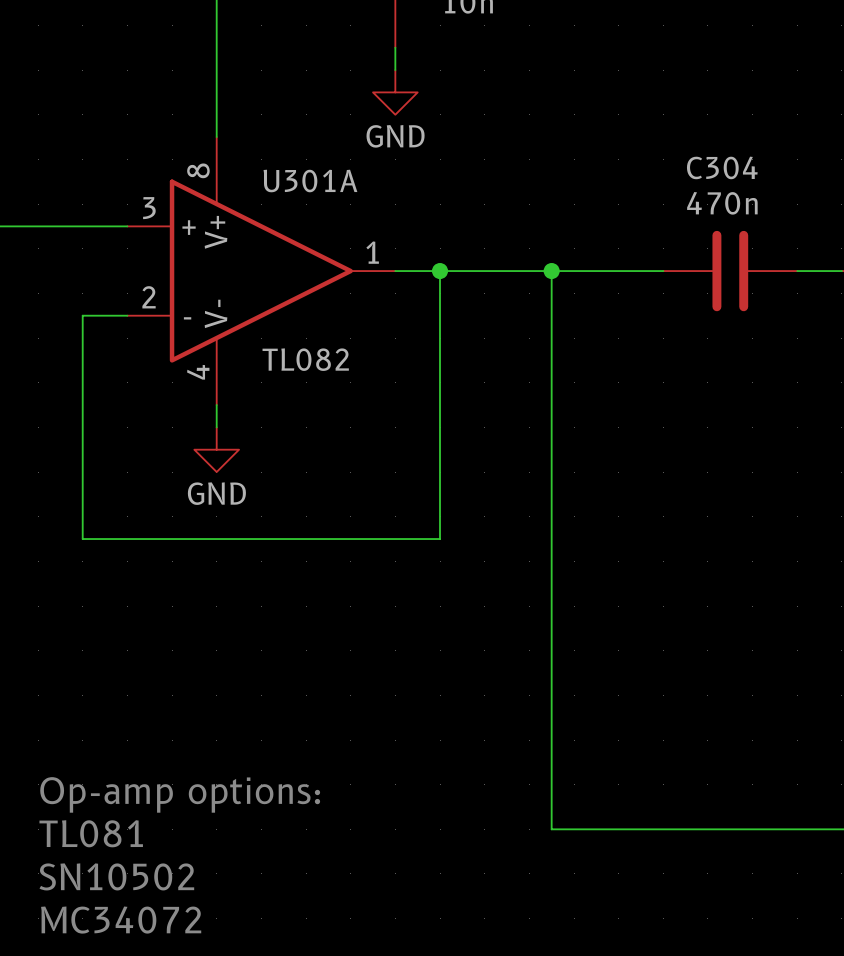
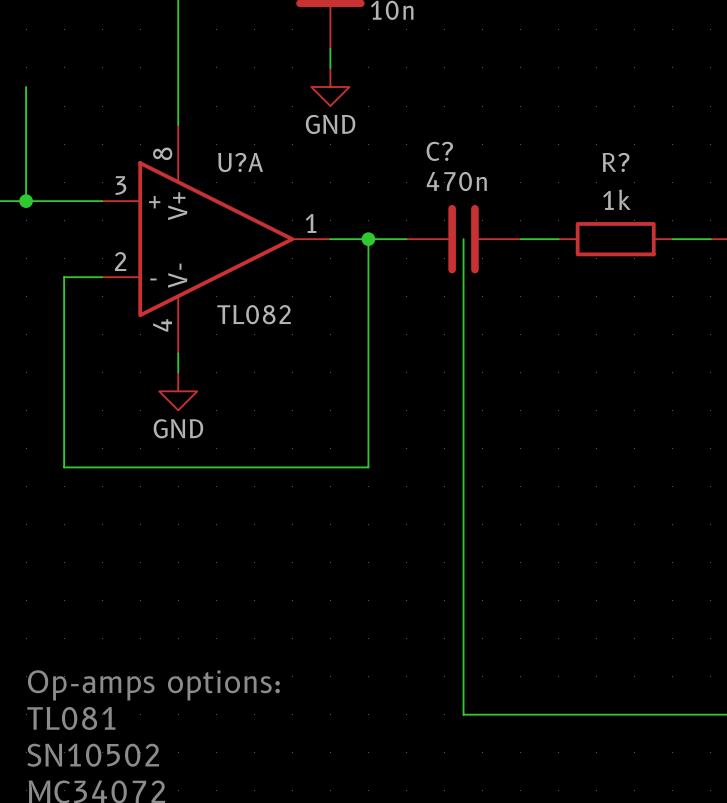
wire: none -> (26, 87) (26, 201)
U301A name: U301A (310, 181) -> U?A (240, 162)
junction: none -> (26, 201)
C?: none -> 470n (463, 239)
junction: (551, 271) -> none
C304: 470n (730, 271) -> none
R?: none -> 1k (615, 239)
text: Op-amp options: (180, 794) -> Op-amps options: (153, 685)

